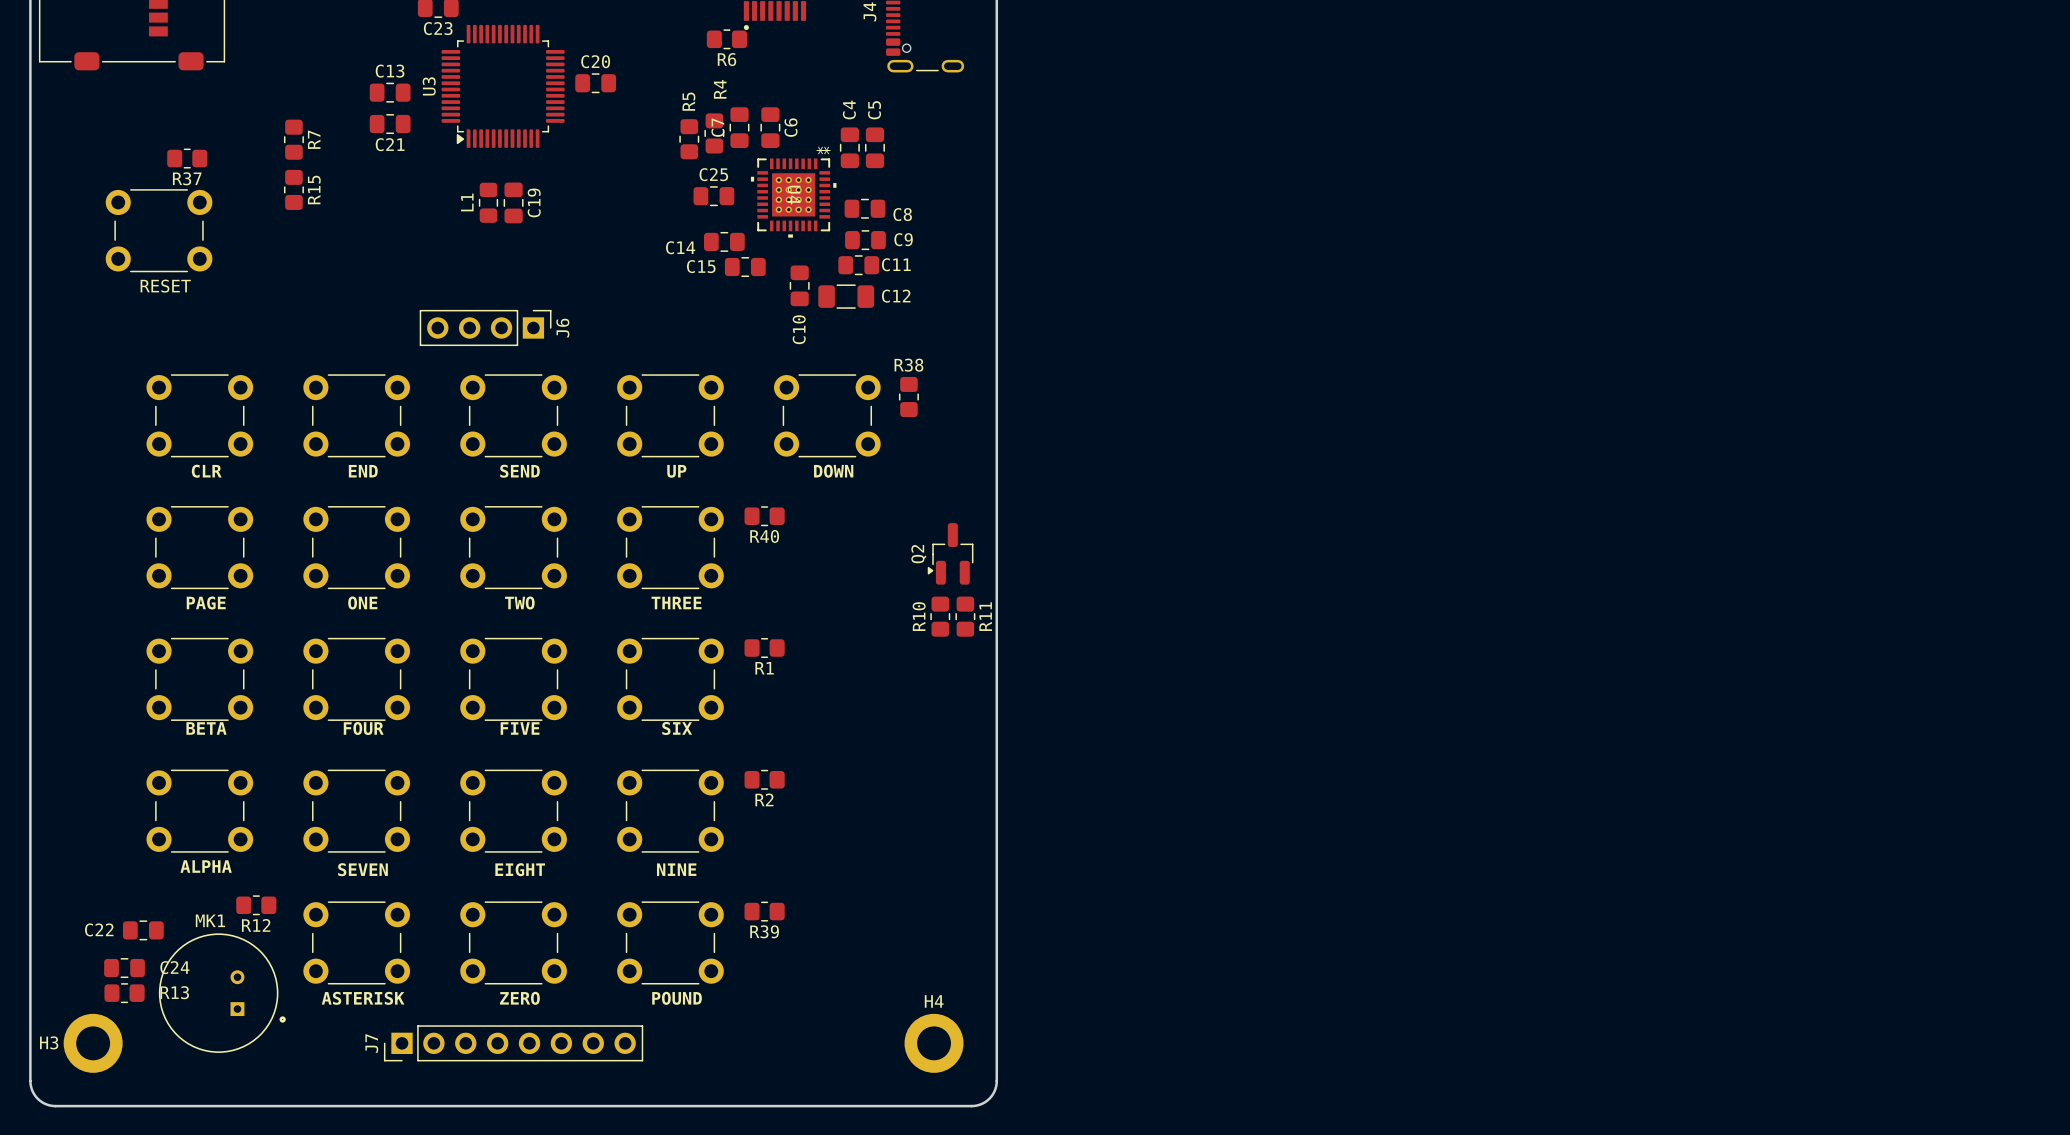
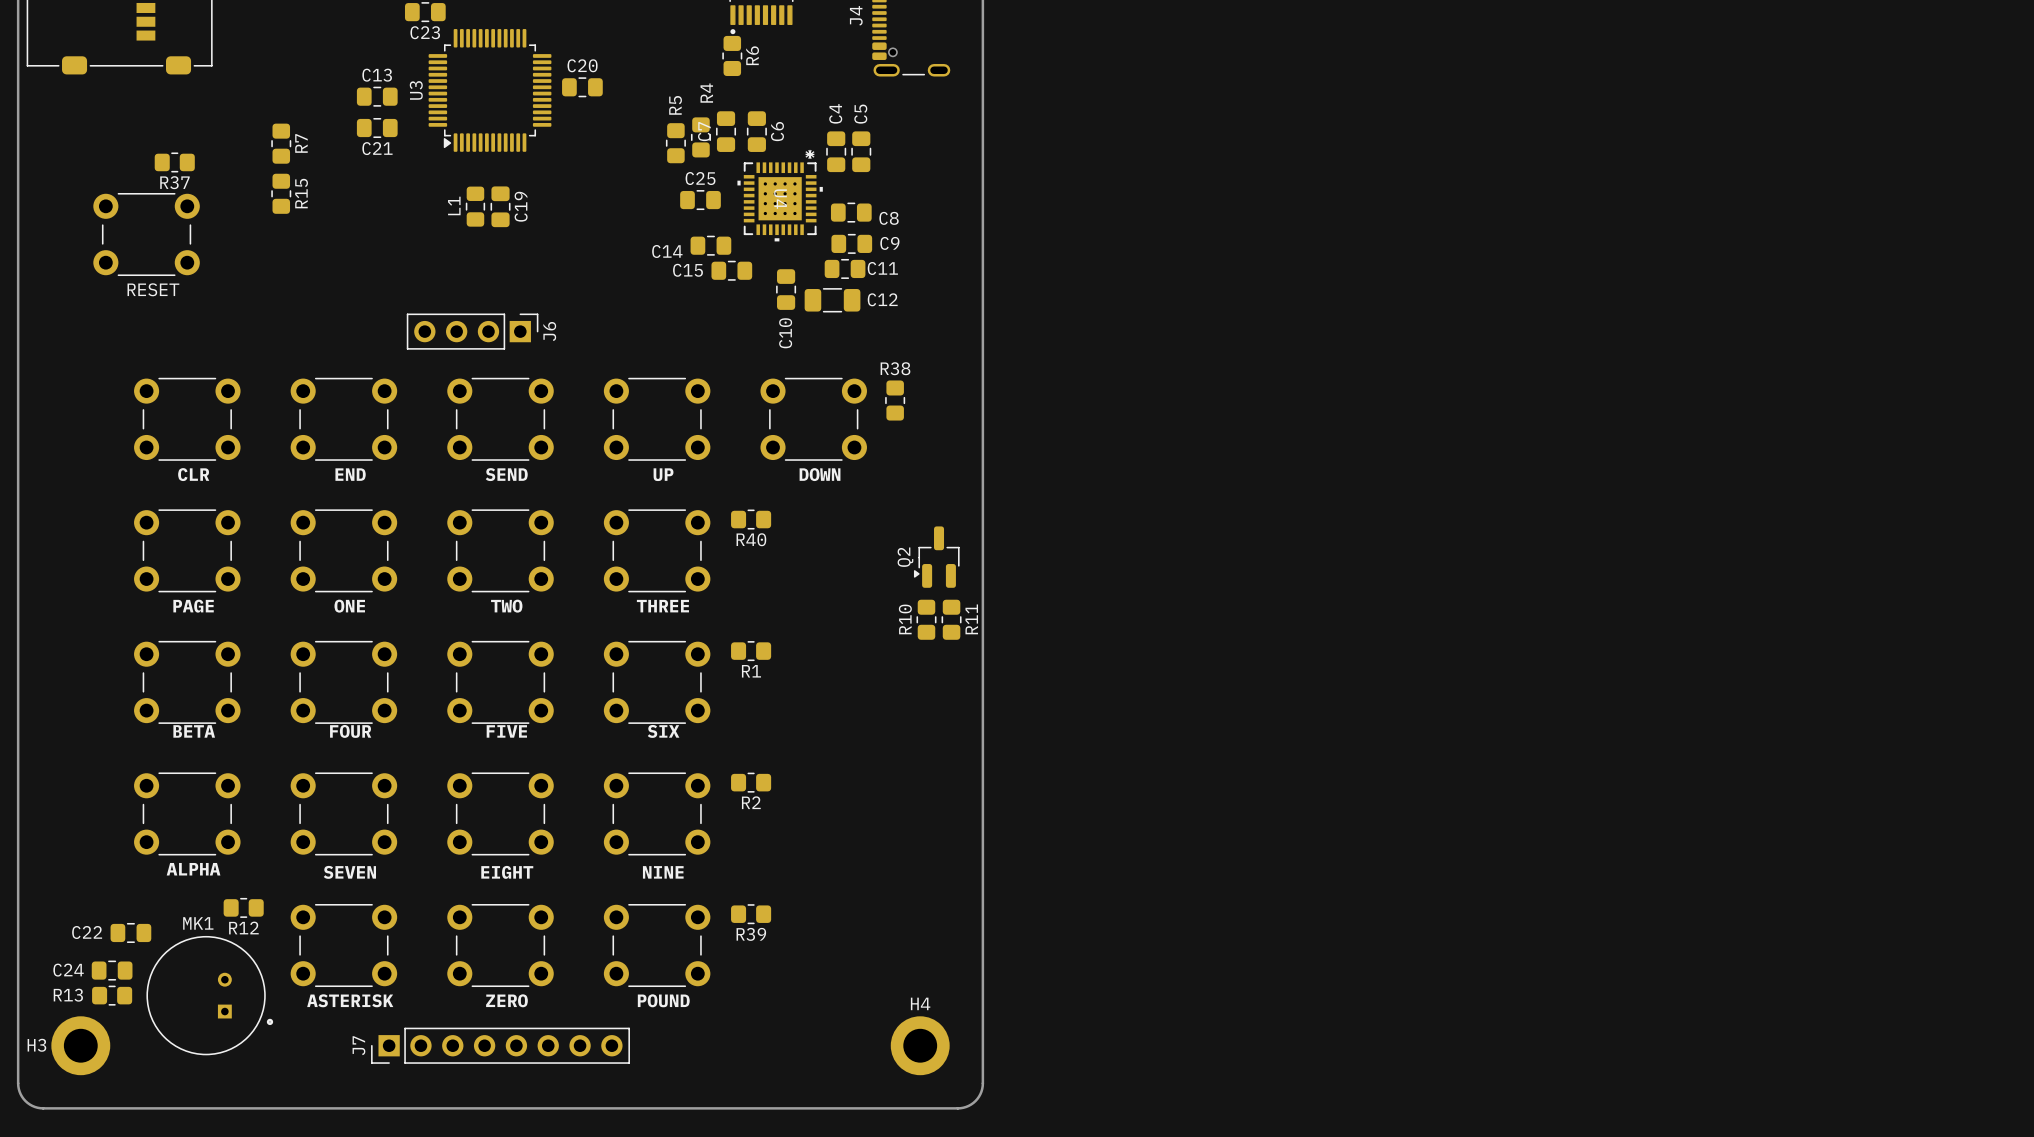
R6 rotation: 0° (726, 39) -> 90° clockwise (732, 55)
R6 name position: R6 (726, 59) -> R6 (752, 55)
C24 name position: C24 (174, 967) -> C24 (68, 970)
R13 name position: R13 (174, 992) -> R13 (68, 995)

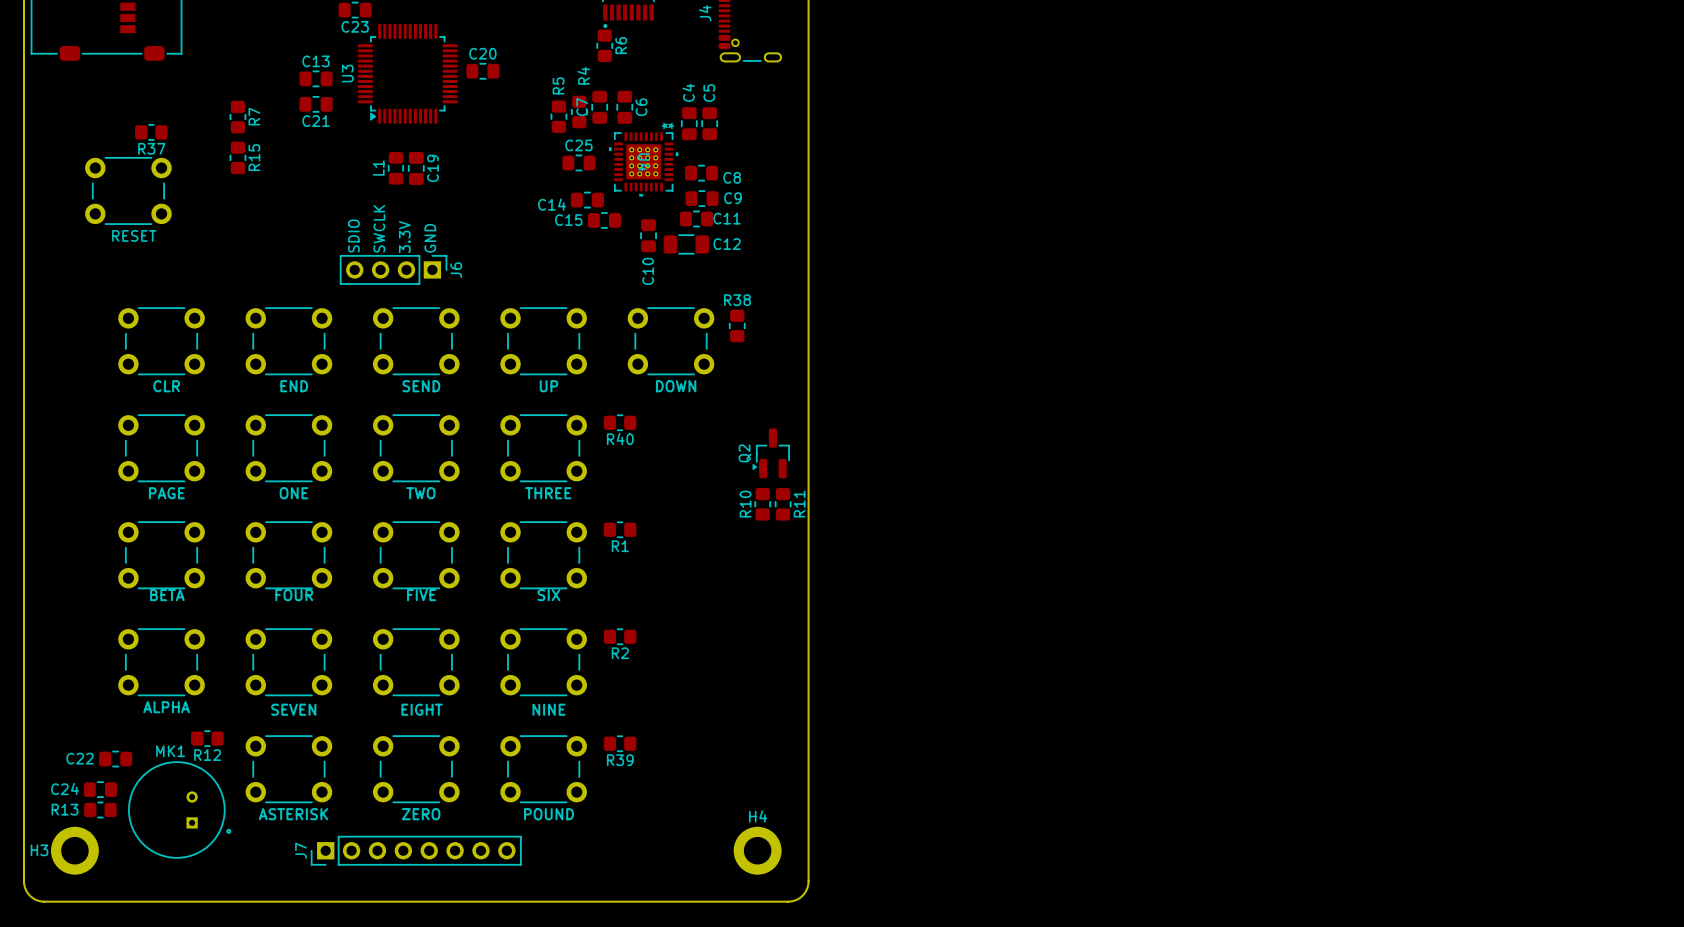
text: none -> SWCLK (379, 228)
text: none -> SDIO (353, 236)
text: none -> 3.3V (404, 237)
text: none -> GND (430, 238)

